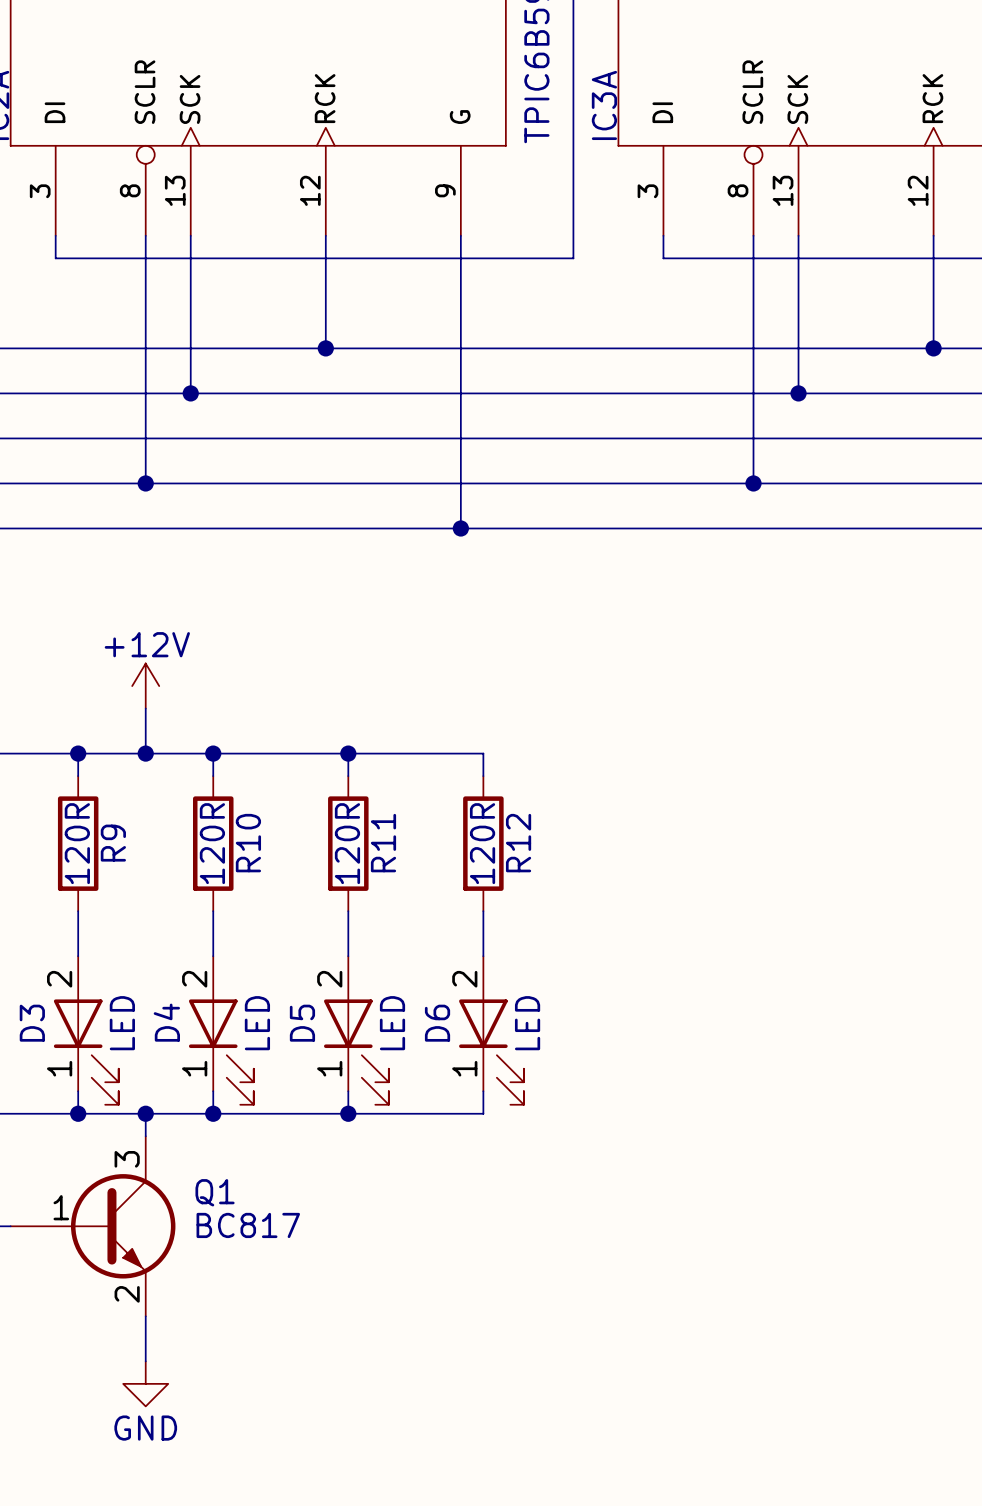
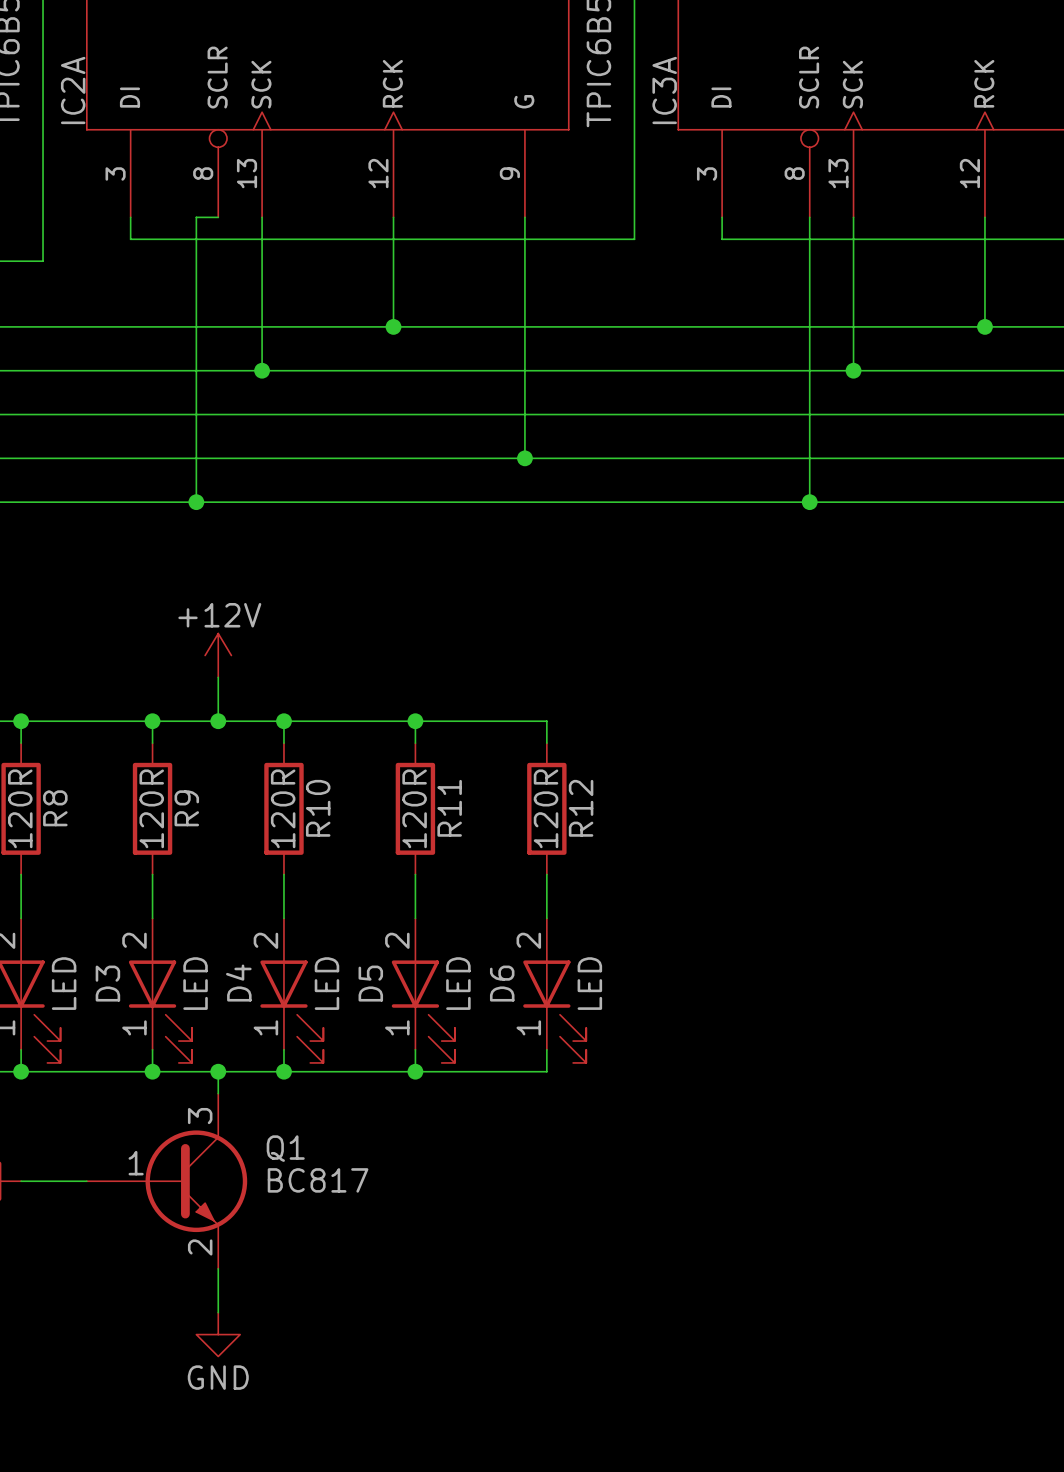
wire: (145, 235) (145, 483) -> (218, 217) (196, 217) (196, 502)
junction position: (145, 483) -> (196, 502)
wire: (460, 483) (460, 528) -> (809, 458) (809, 502)
junction position: (753, 483) -> (809, 502)
junction position: (460, 528) -> (524, 458)

